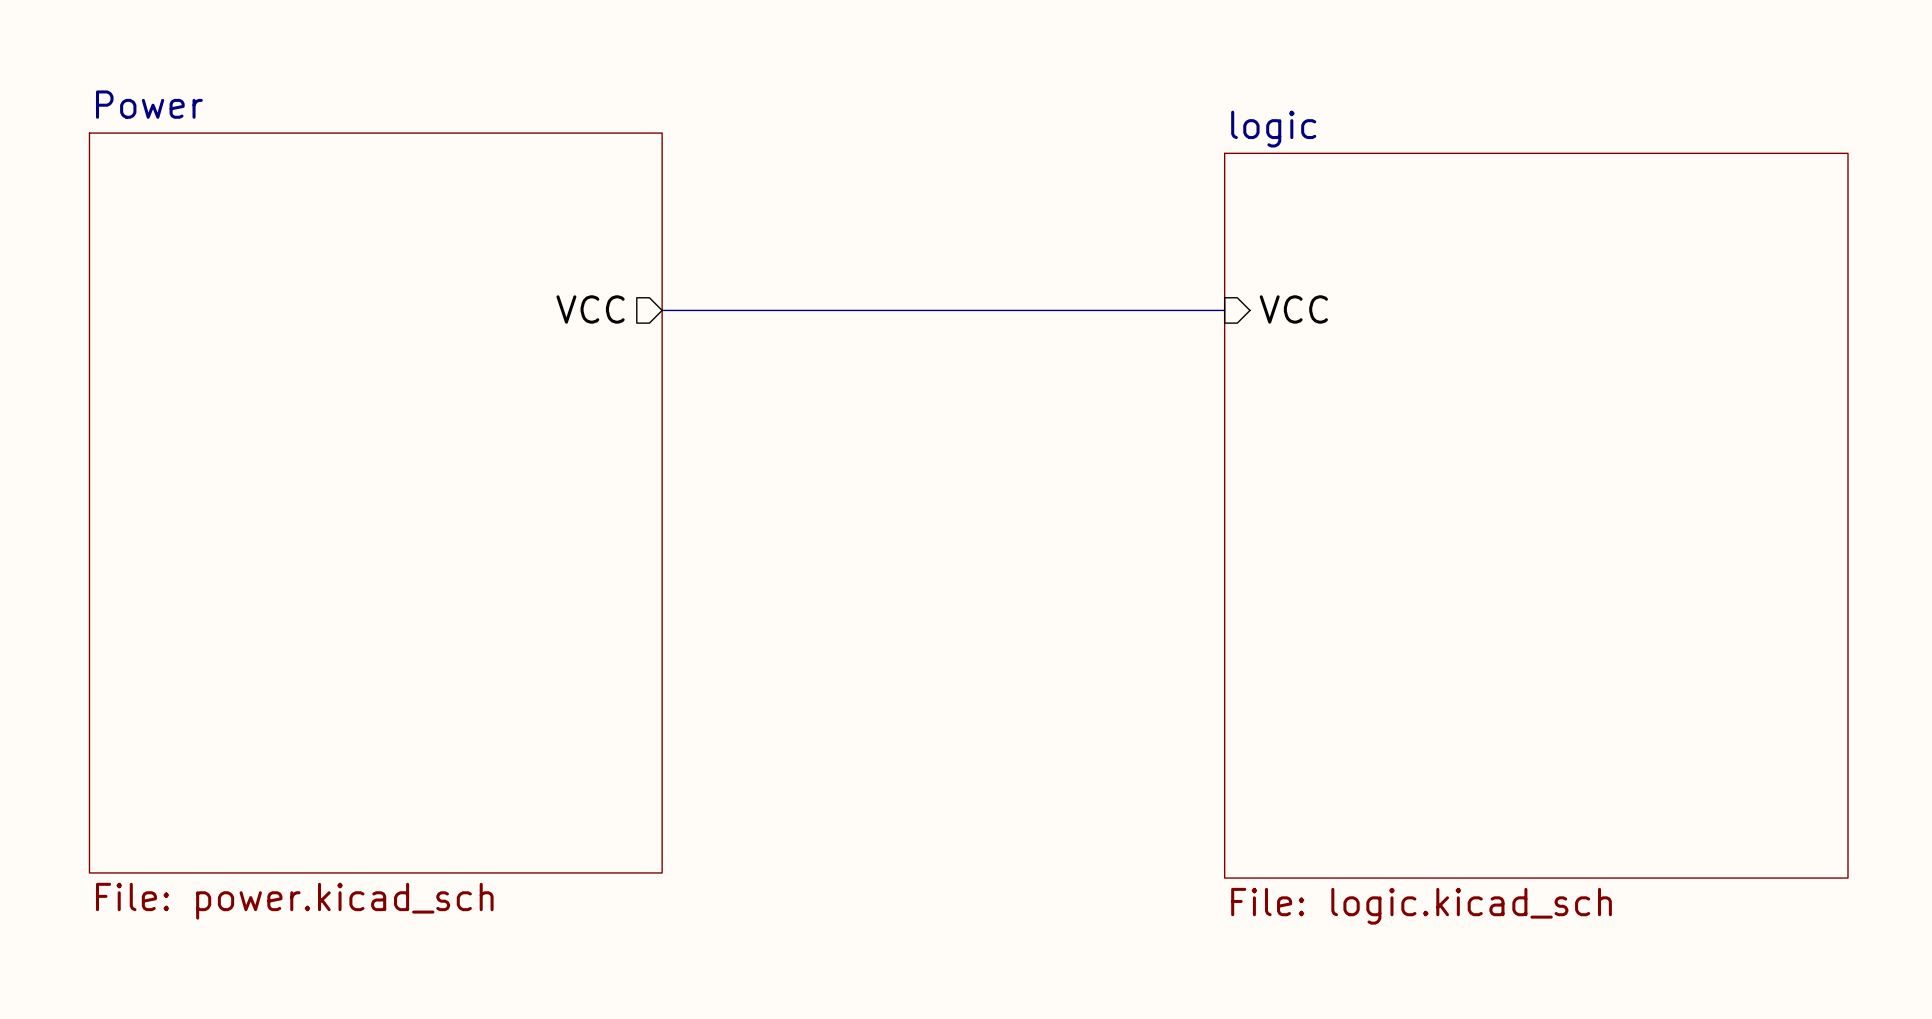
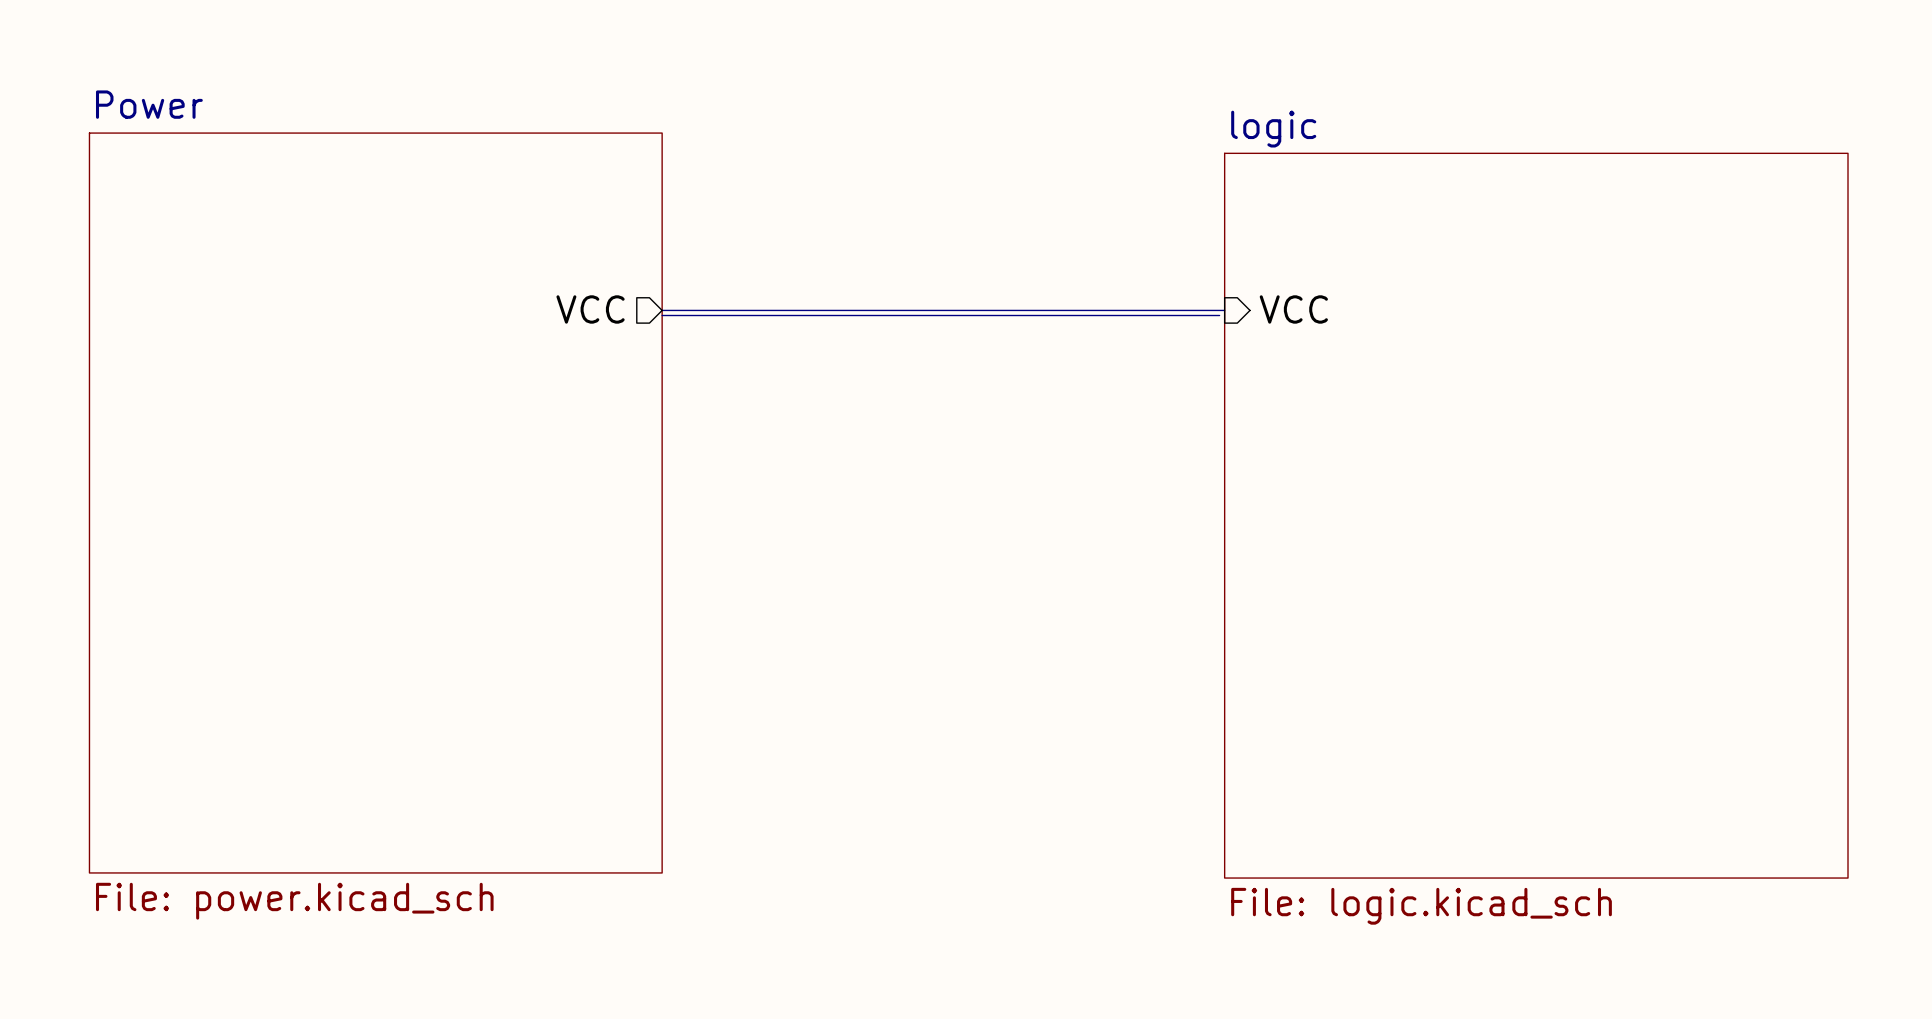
wire: none -> (662, 315) (1219, 315)

